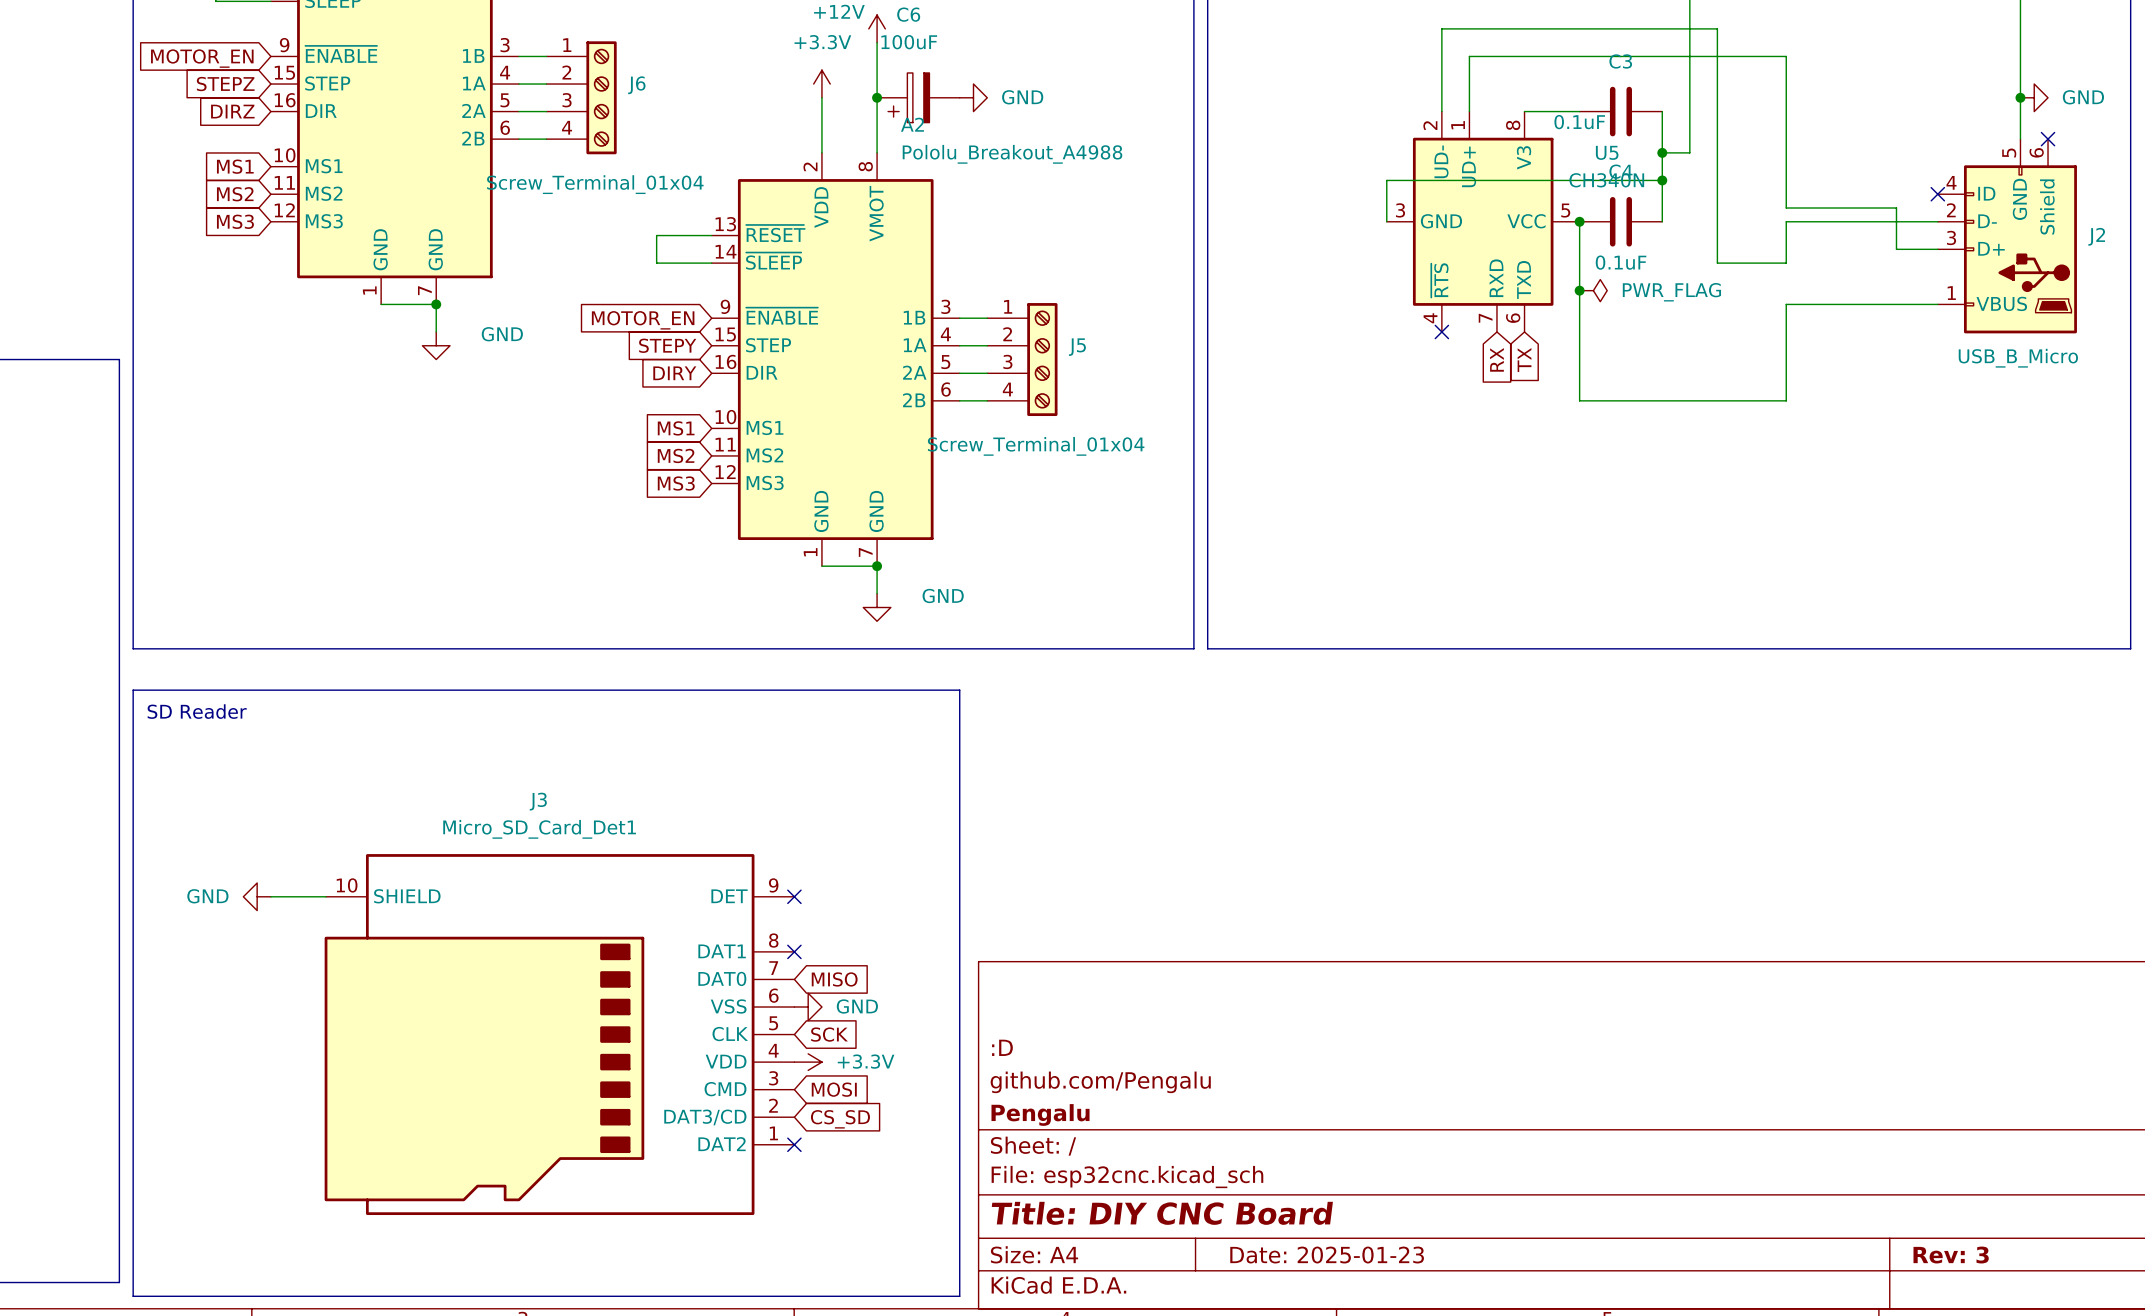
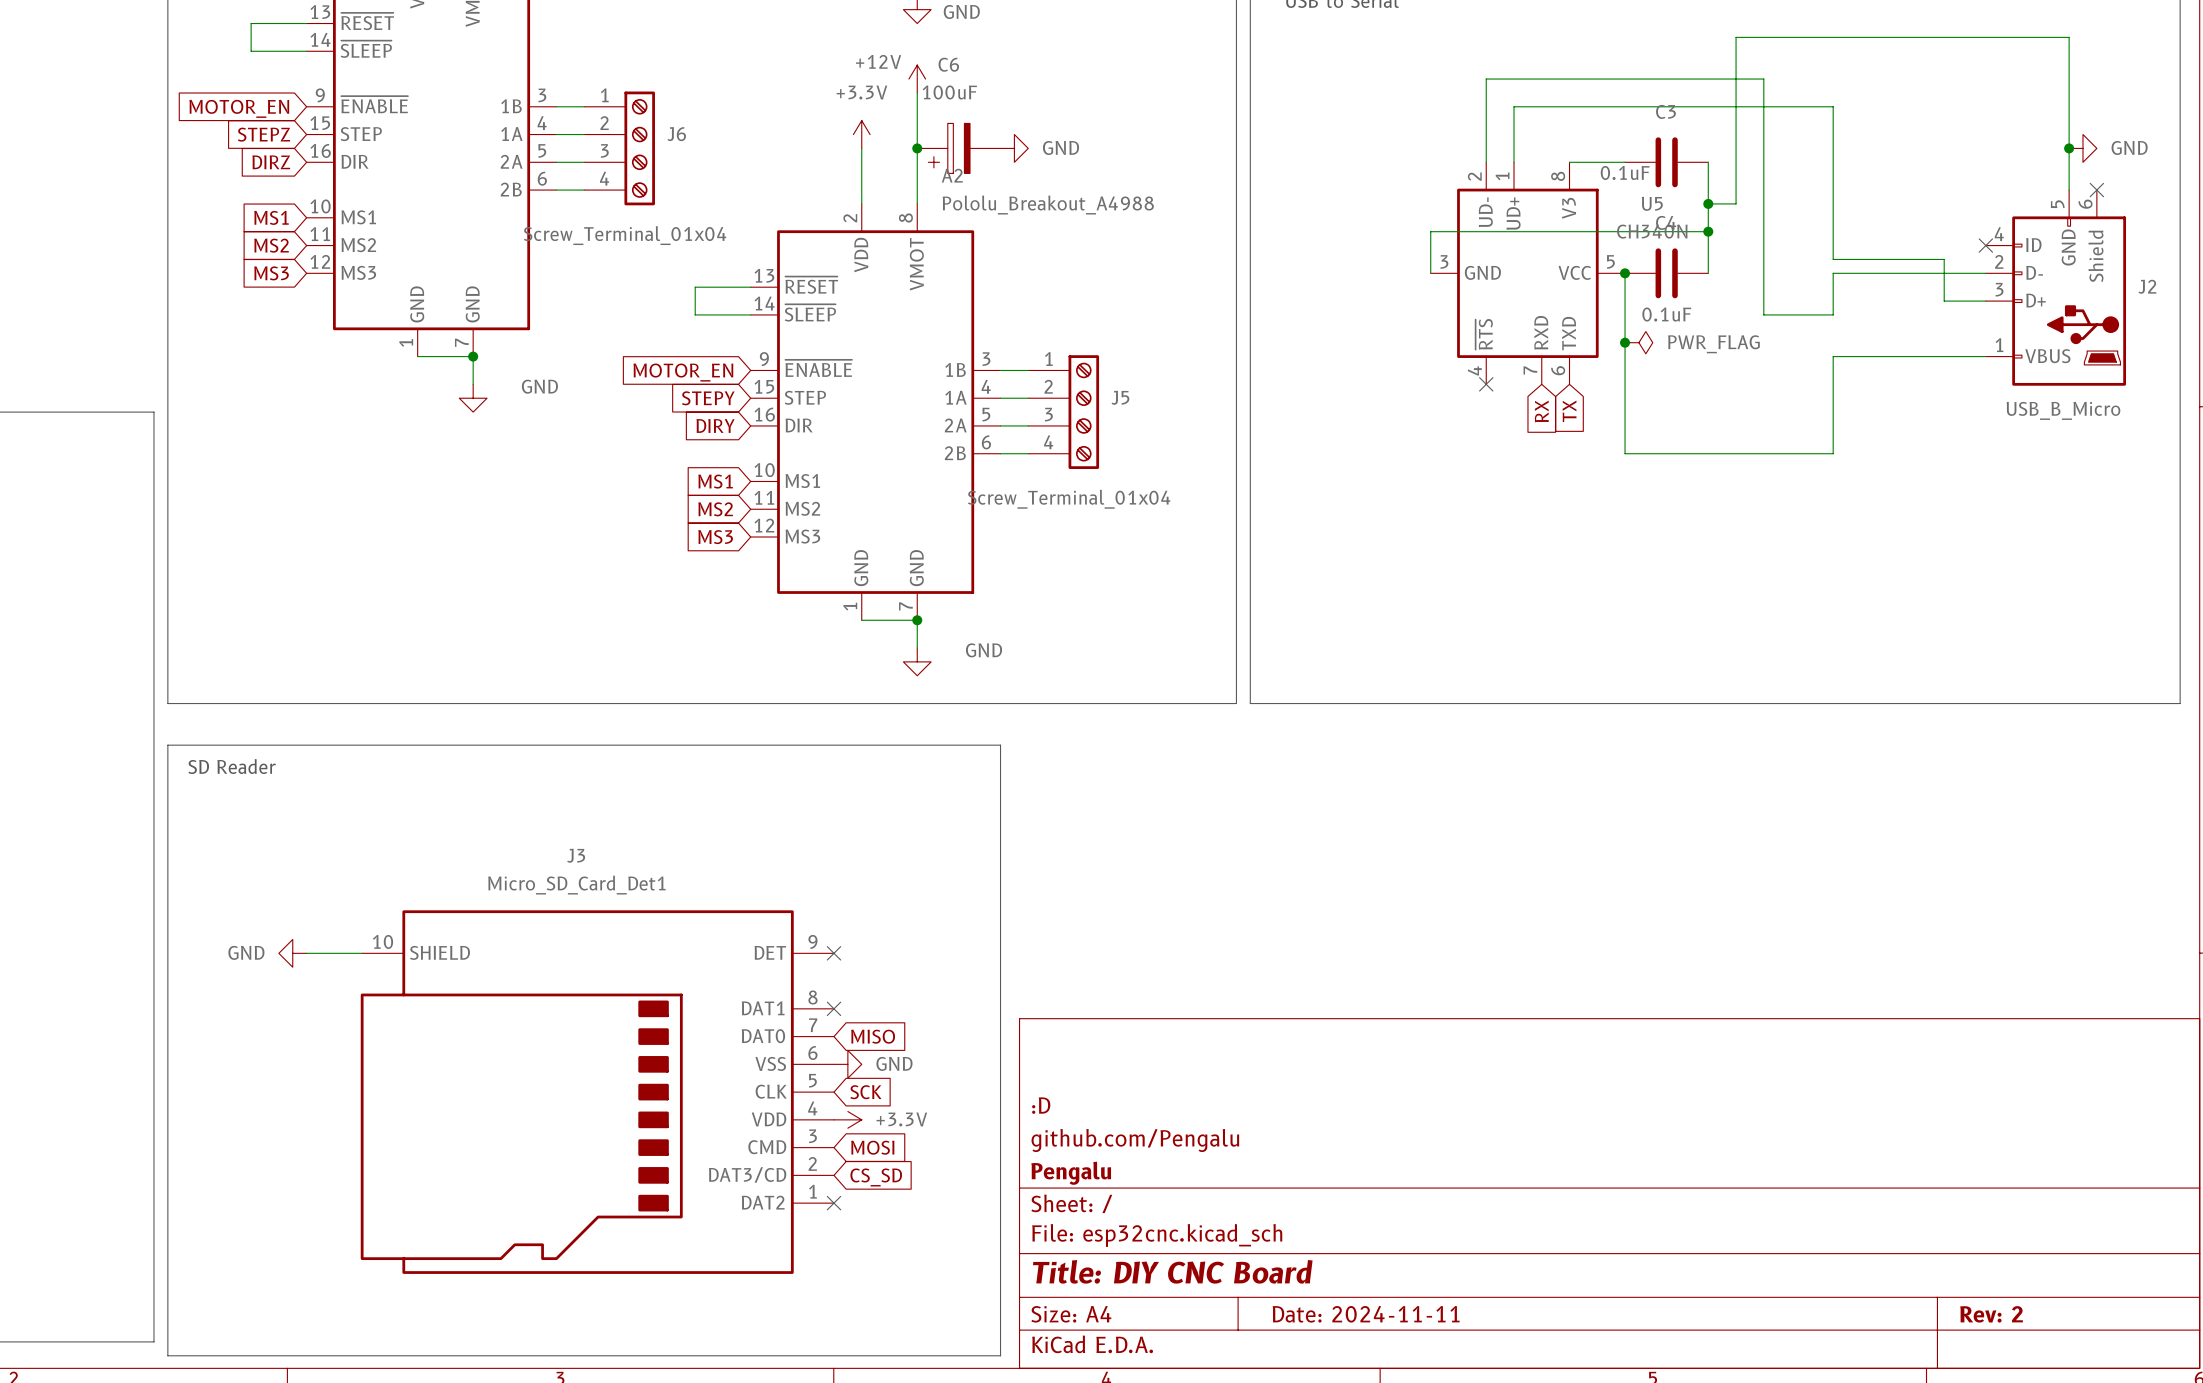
title block: Date: 2025-01-23 (1327, 1255) -> Date: 2024-11-11 (1366, 1314)
title block: Rev: 3 (1951, 1255) -> Rev: 2 (1991, 1314)

